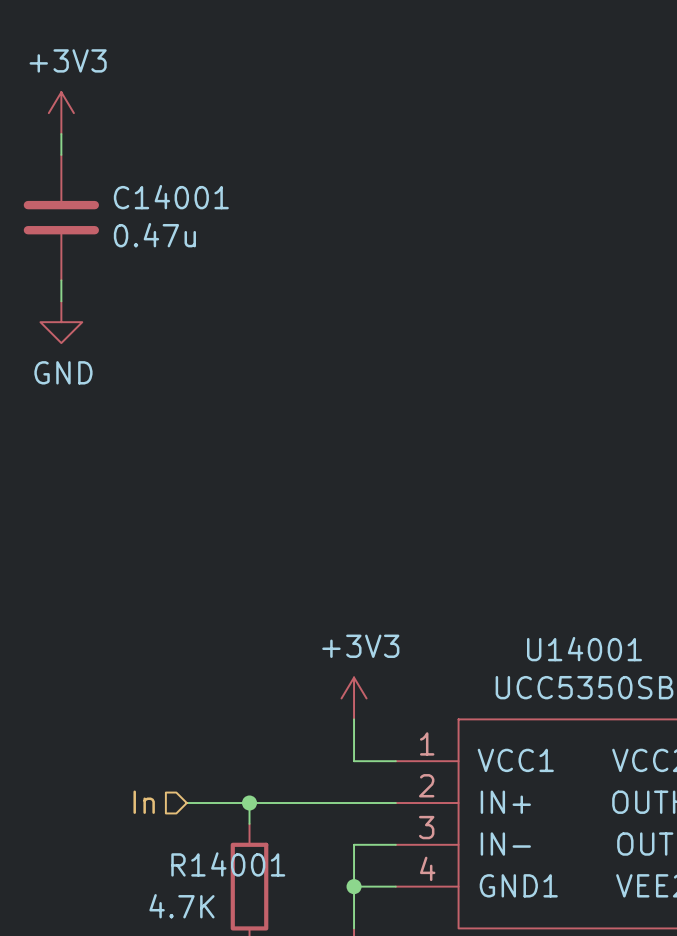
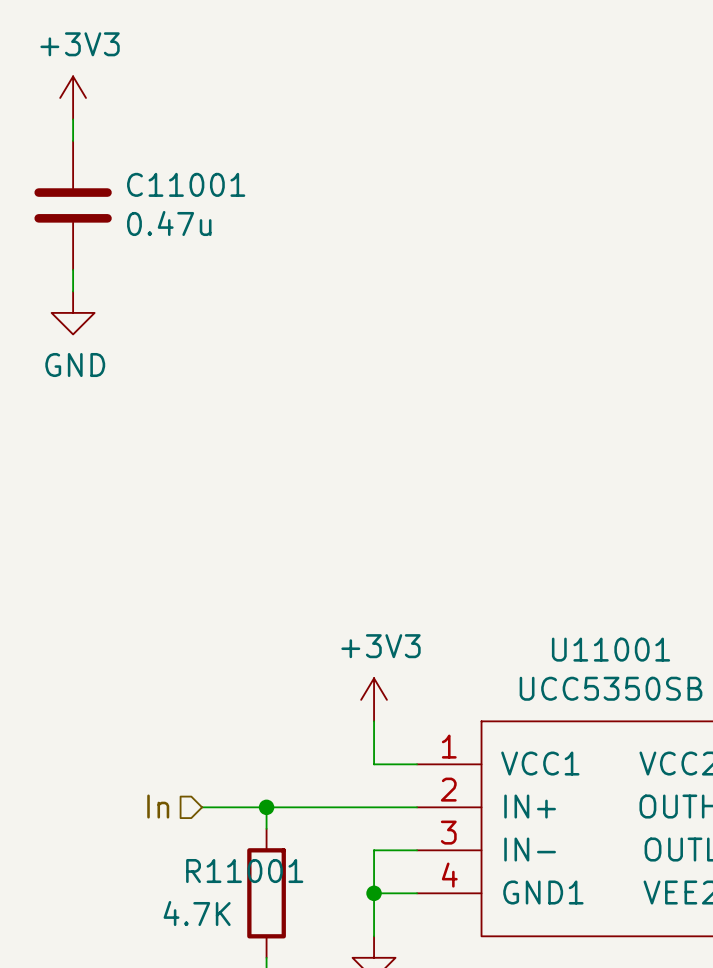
C14001 name: C14001 (171, 197) -> C11001 (186, 184)
U14001 name: U14001 (584, 649) -> U11001 (611, 649)
R14001 name: R14001 (228, 864) -> R11001 (244, 871)

